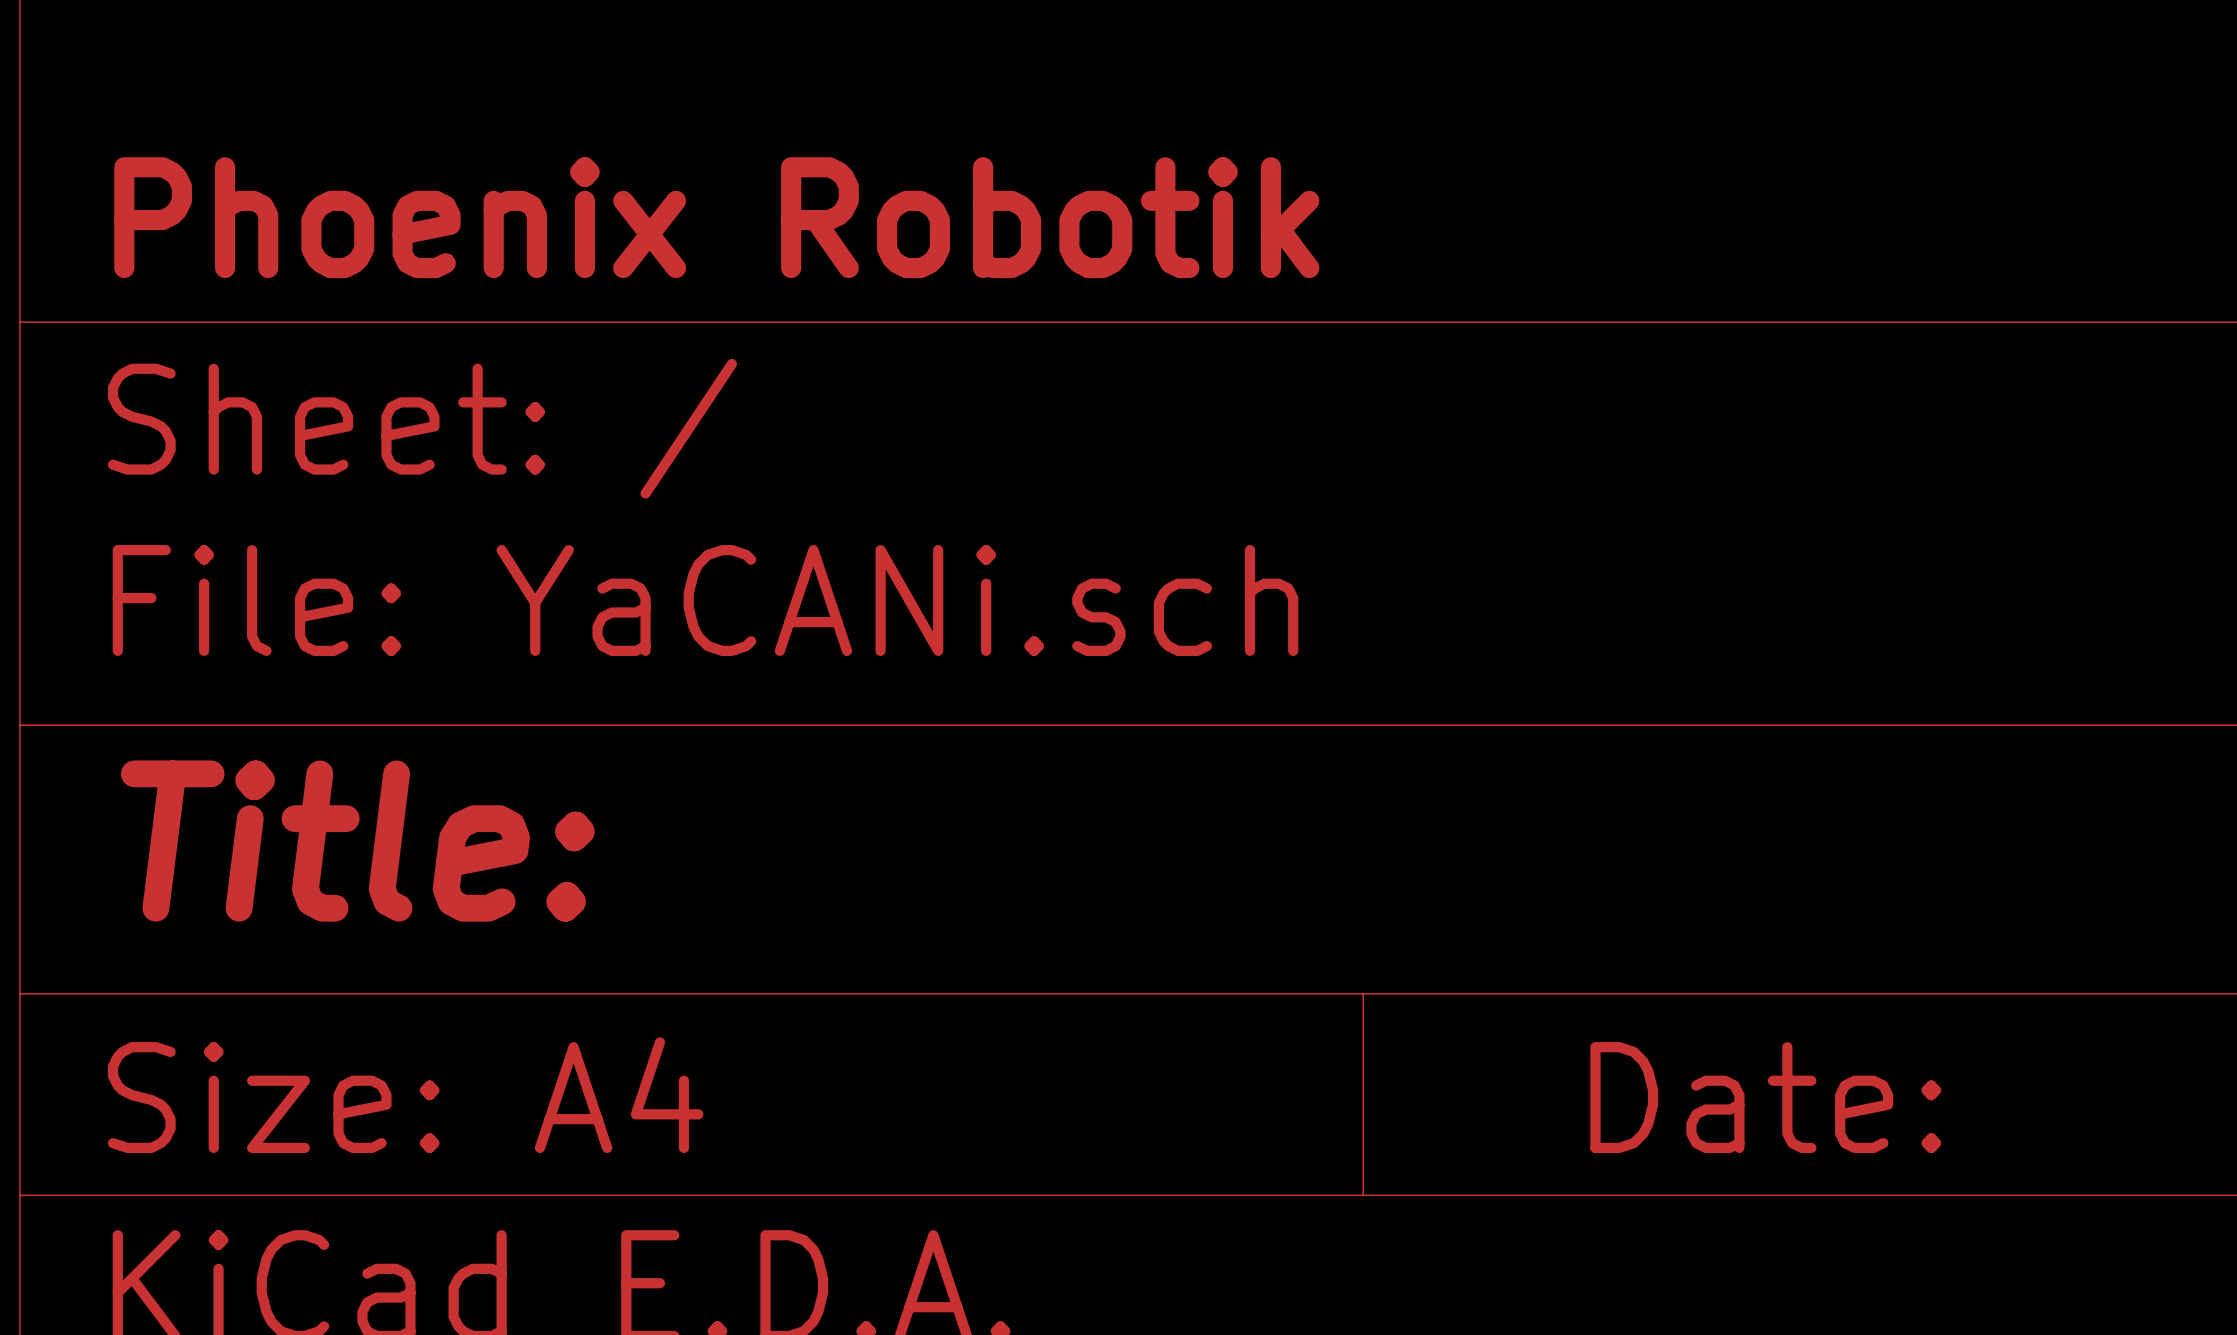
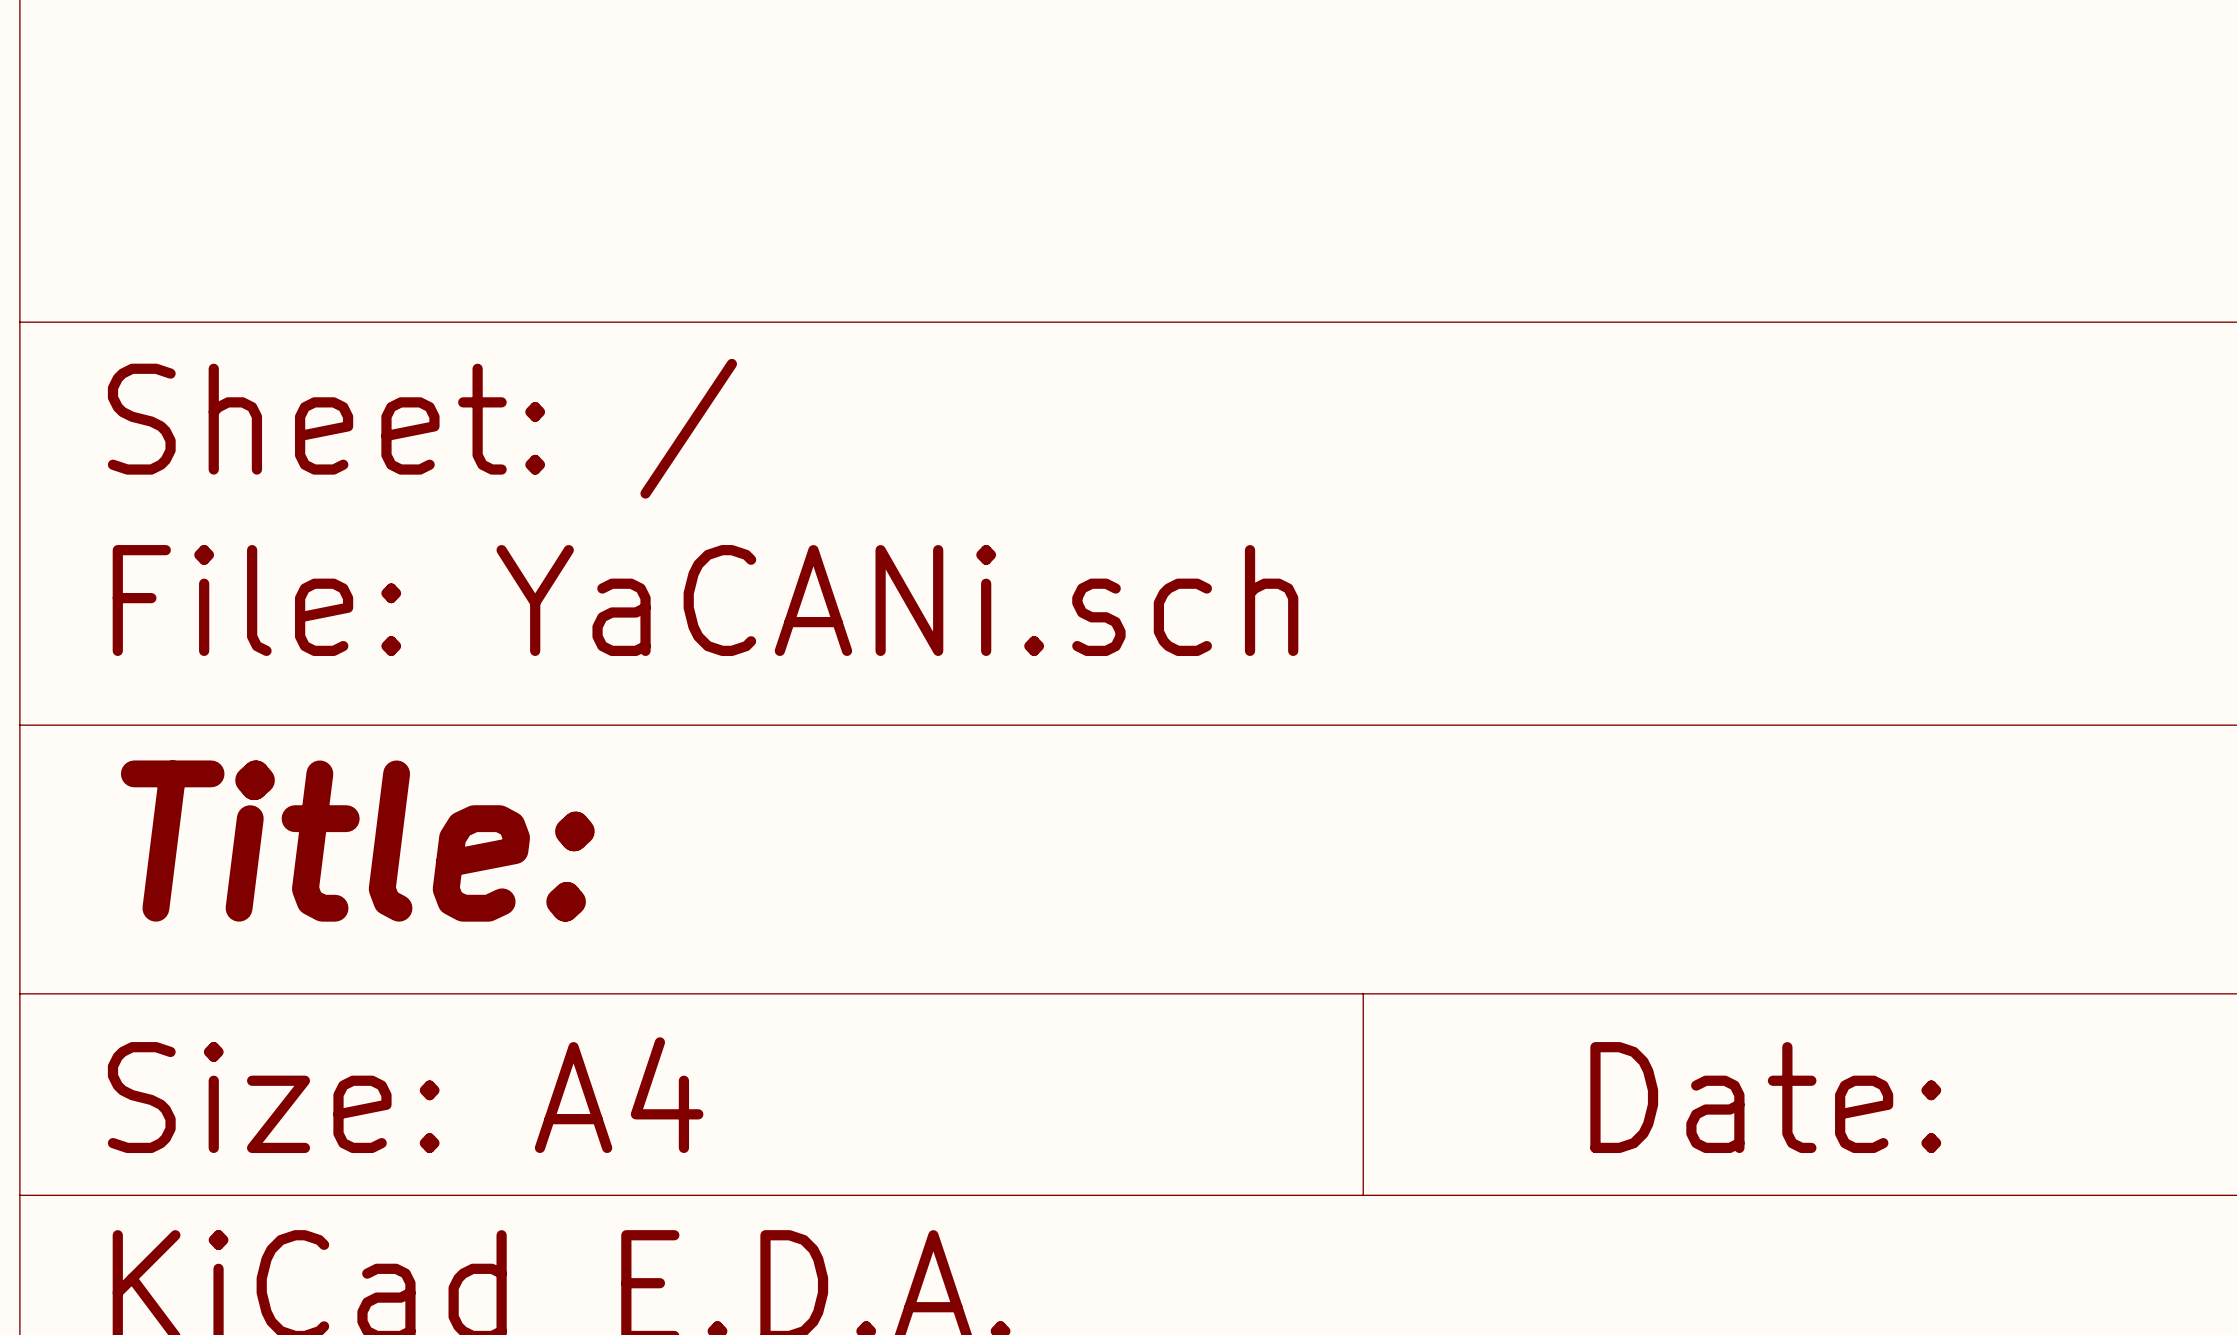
title block: Phoenix Robotik (716, 217) -> none

